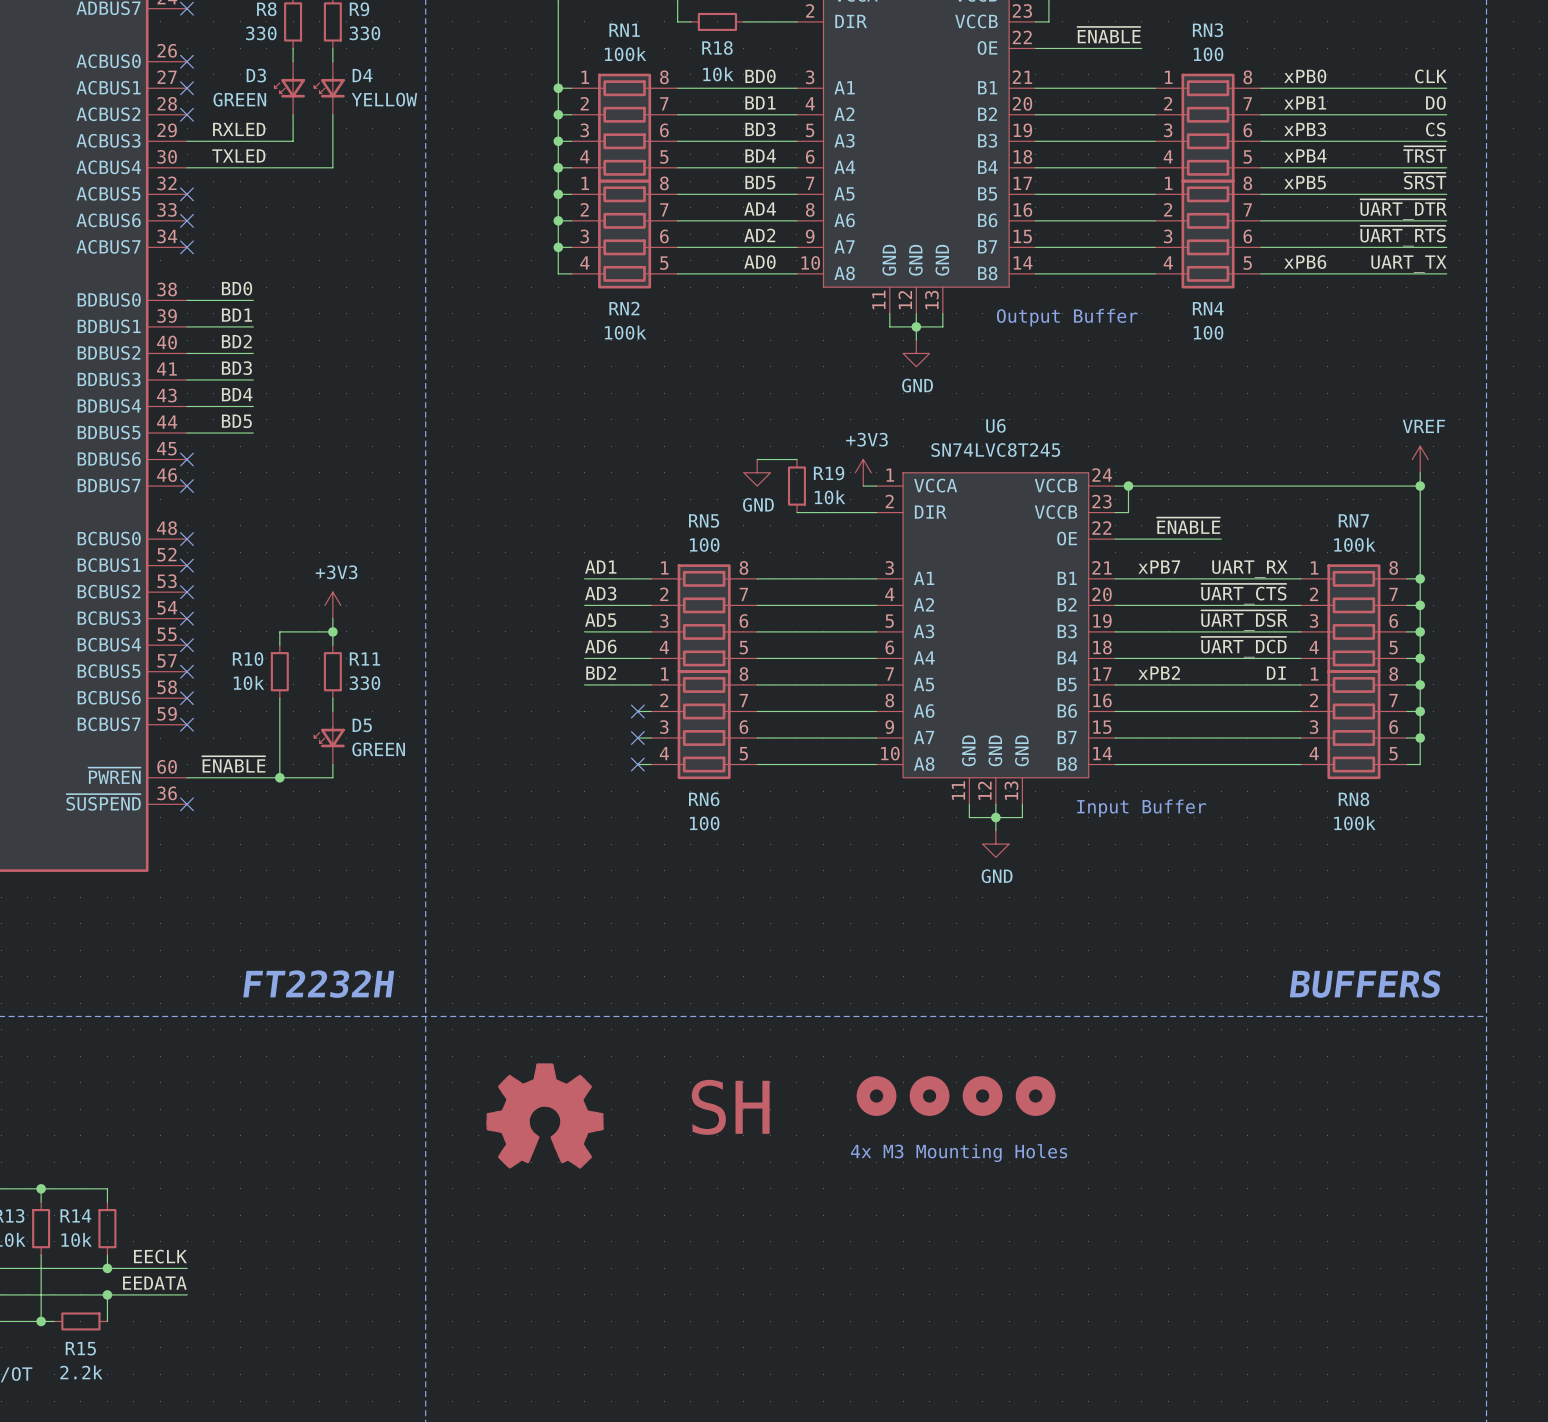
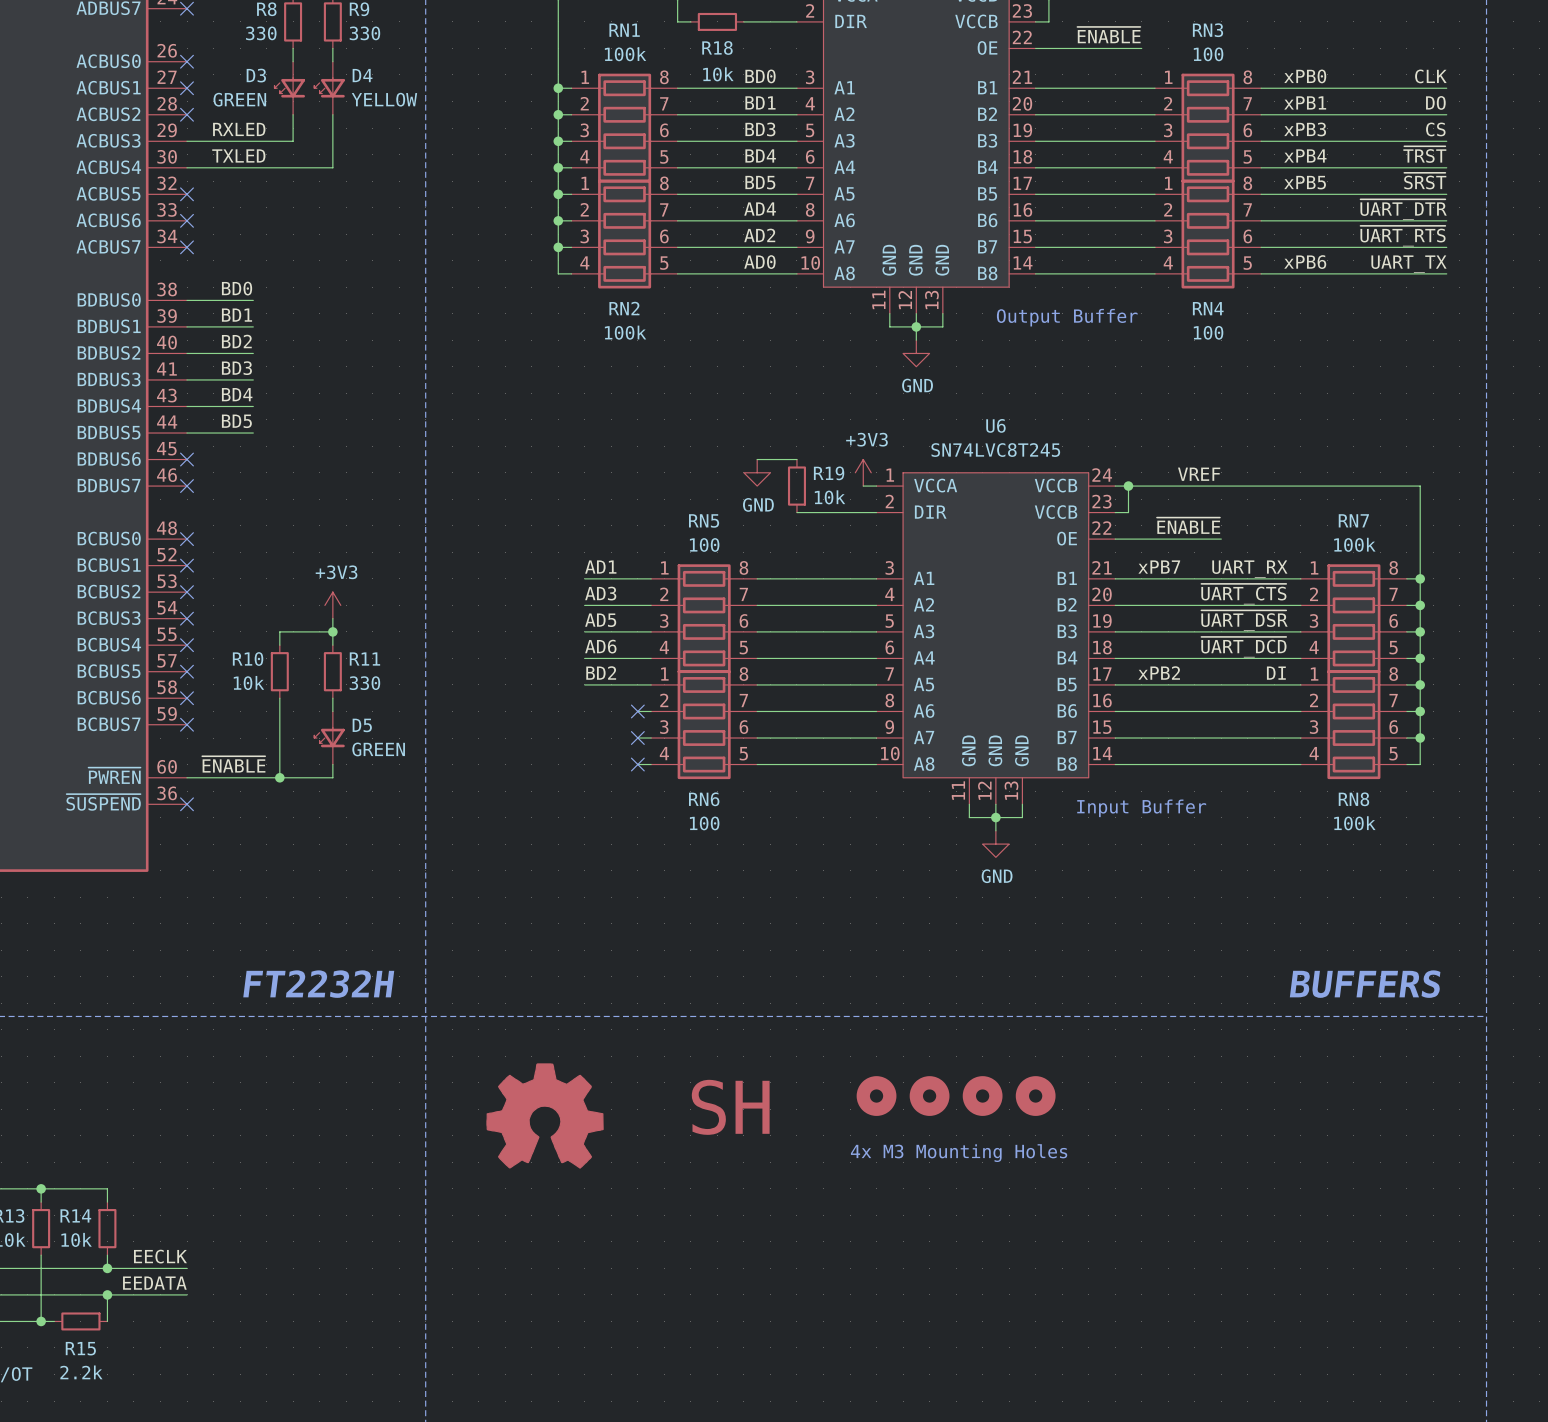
power symbol: VREF (1420, 459) -> none
wire: (1420, 472) (1420, 486) -> none
label: none -> VREF (1199, 474)
junction: (1420, 486) -> none

